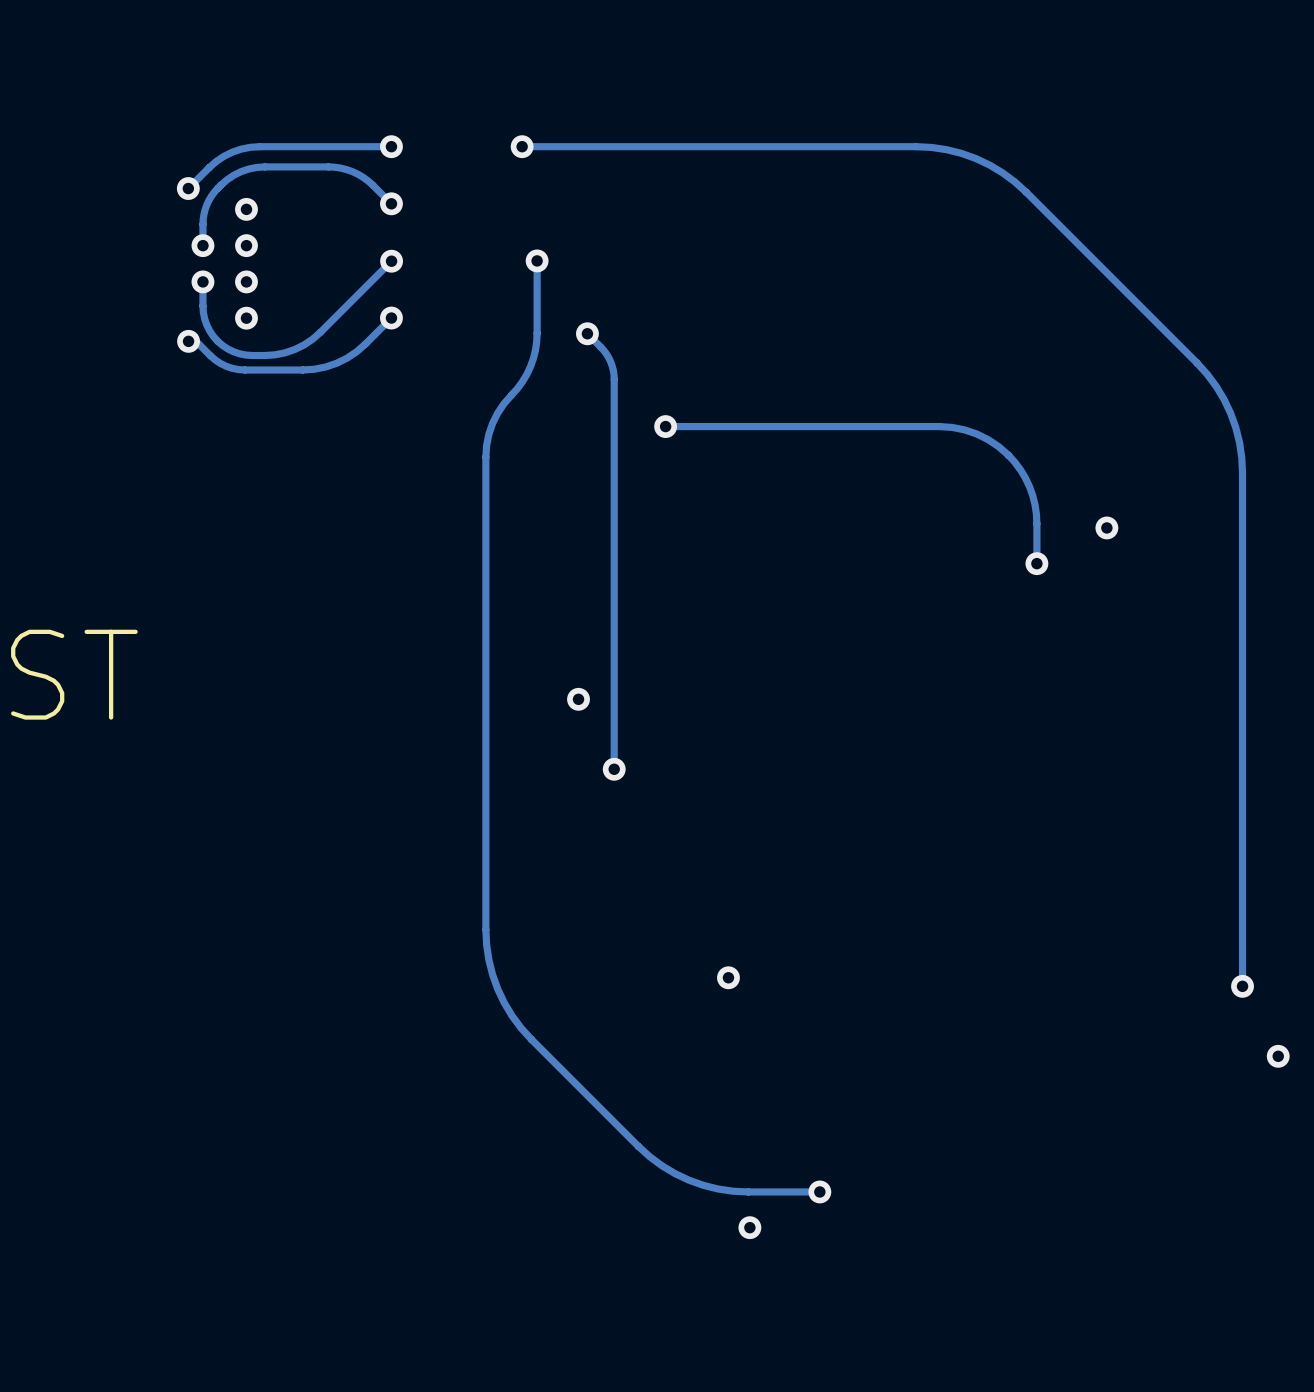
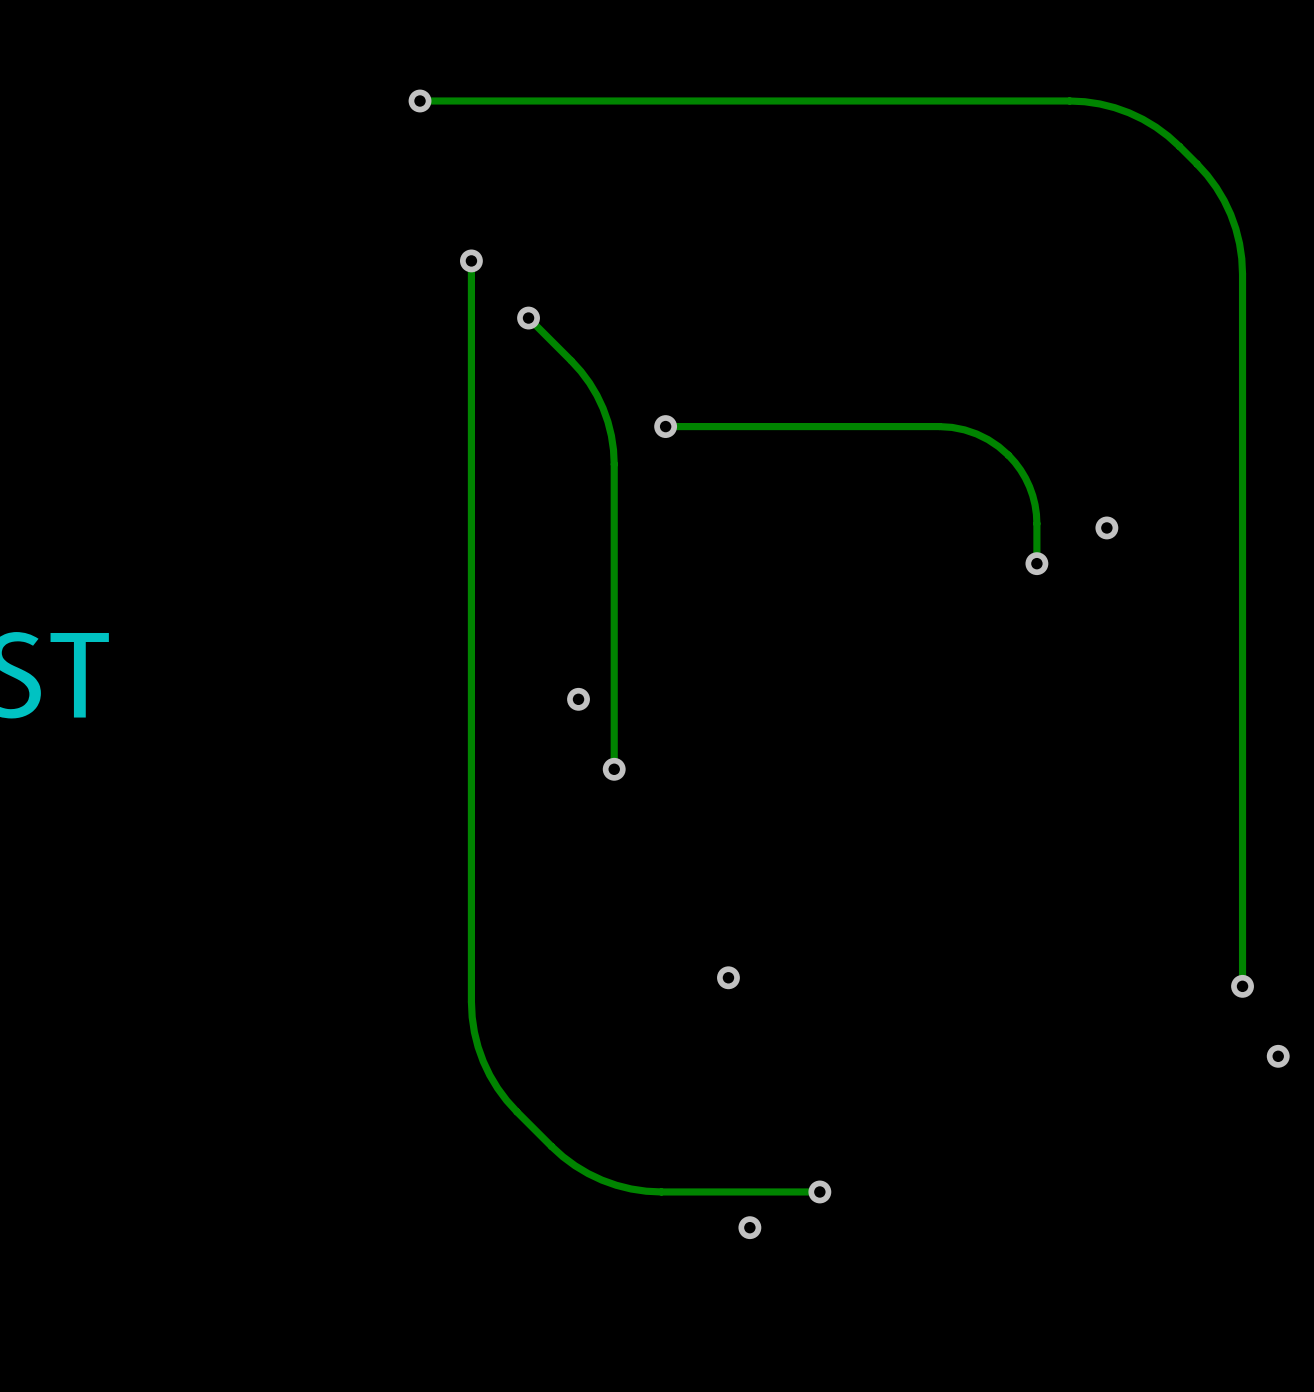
via: none -> (420, 100)
track: (391, 146) (259, 146) (241, 149) (216, 161) (188, 188) -> none
via: (391, 146) -> none
track: (522, 146) (916, 146) (946, 149) (975, 158) (1002, 172) (1026, 192) (1207, 374) (1230, 413) (1239, 442) (1242, 472) -> (420, 100) (1069, 100) (1099, 103) (1129, 112) (1168, 136) (1197, 164) (1224, 200) (1235, 228) (1242, 273) (1242, 472)
via: (522, 146) -> none
via: (188, 188) -> none
track: (391, 203) (363, 177) (340, 168) (264, 166) (248, 169) (227, 179) (209, 200) (203, 219) (202, 245) -> none
via: (391, 203) -> none
via: (246, 209) -> none
via: (202, 245) -> none
via: (246, 245) -> none
via: none -> (471, 260)
track: (537, 260) (537, 333) (533, 358) (522, 381) (497, 413) (486, 445) (485, 929) (488, 959) (497, 988) (521, 1028) (649, 1156) (675, 1173) (703, 1185) (748, 1191) -> (471, 260) (471, 1001) (478, 1047) (489, 1075) (506, 1100) (562, 1156) (588, 1173) (616, 1185) (646, 1191) (748, 1191)
via: (537, 260) -> none
track: (391, 261) (312, 339) (294, 349) (274, 354) (239, 353) (227, 348) (217, 341) (209, 330) (204, 318) (202, 281) -> none
via: (391, 261) -> none
via: (202, 281) -> none
via: (246, 281) -> none
via: (246, 318) -> none
track: (391, 318) (365, 344) (347, 358) (336, 363) (314, 369) (244, 370) (232, 368) (215, 359) (197, 342) (188, 341) -> none
via: (391, 318) -> none
via: none -> (528, 318)
track: (587, 333) (606, 354) (613, 370) (614, 464) -> (528, 318) (581, 371) (596, 395) (611, 435) (614, 464)
via: (587, 333) -> none
via: (188, 341) -> none

